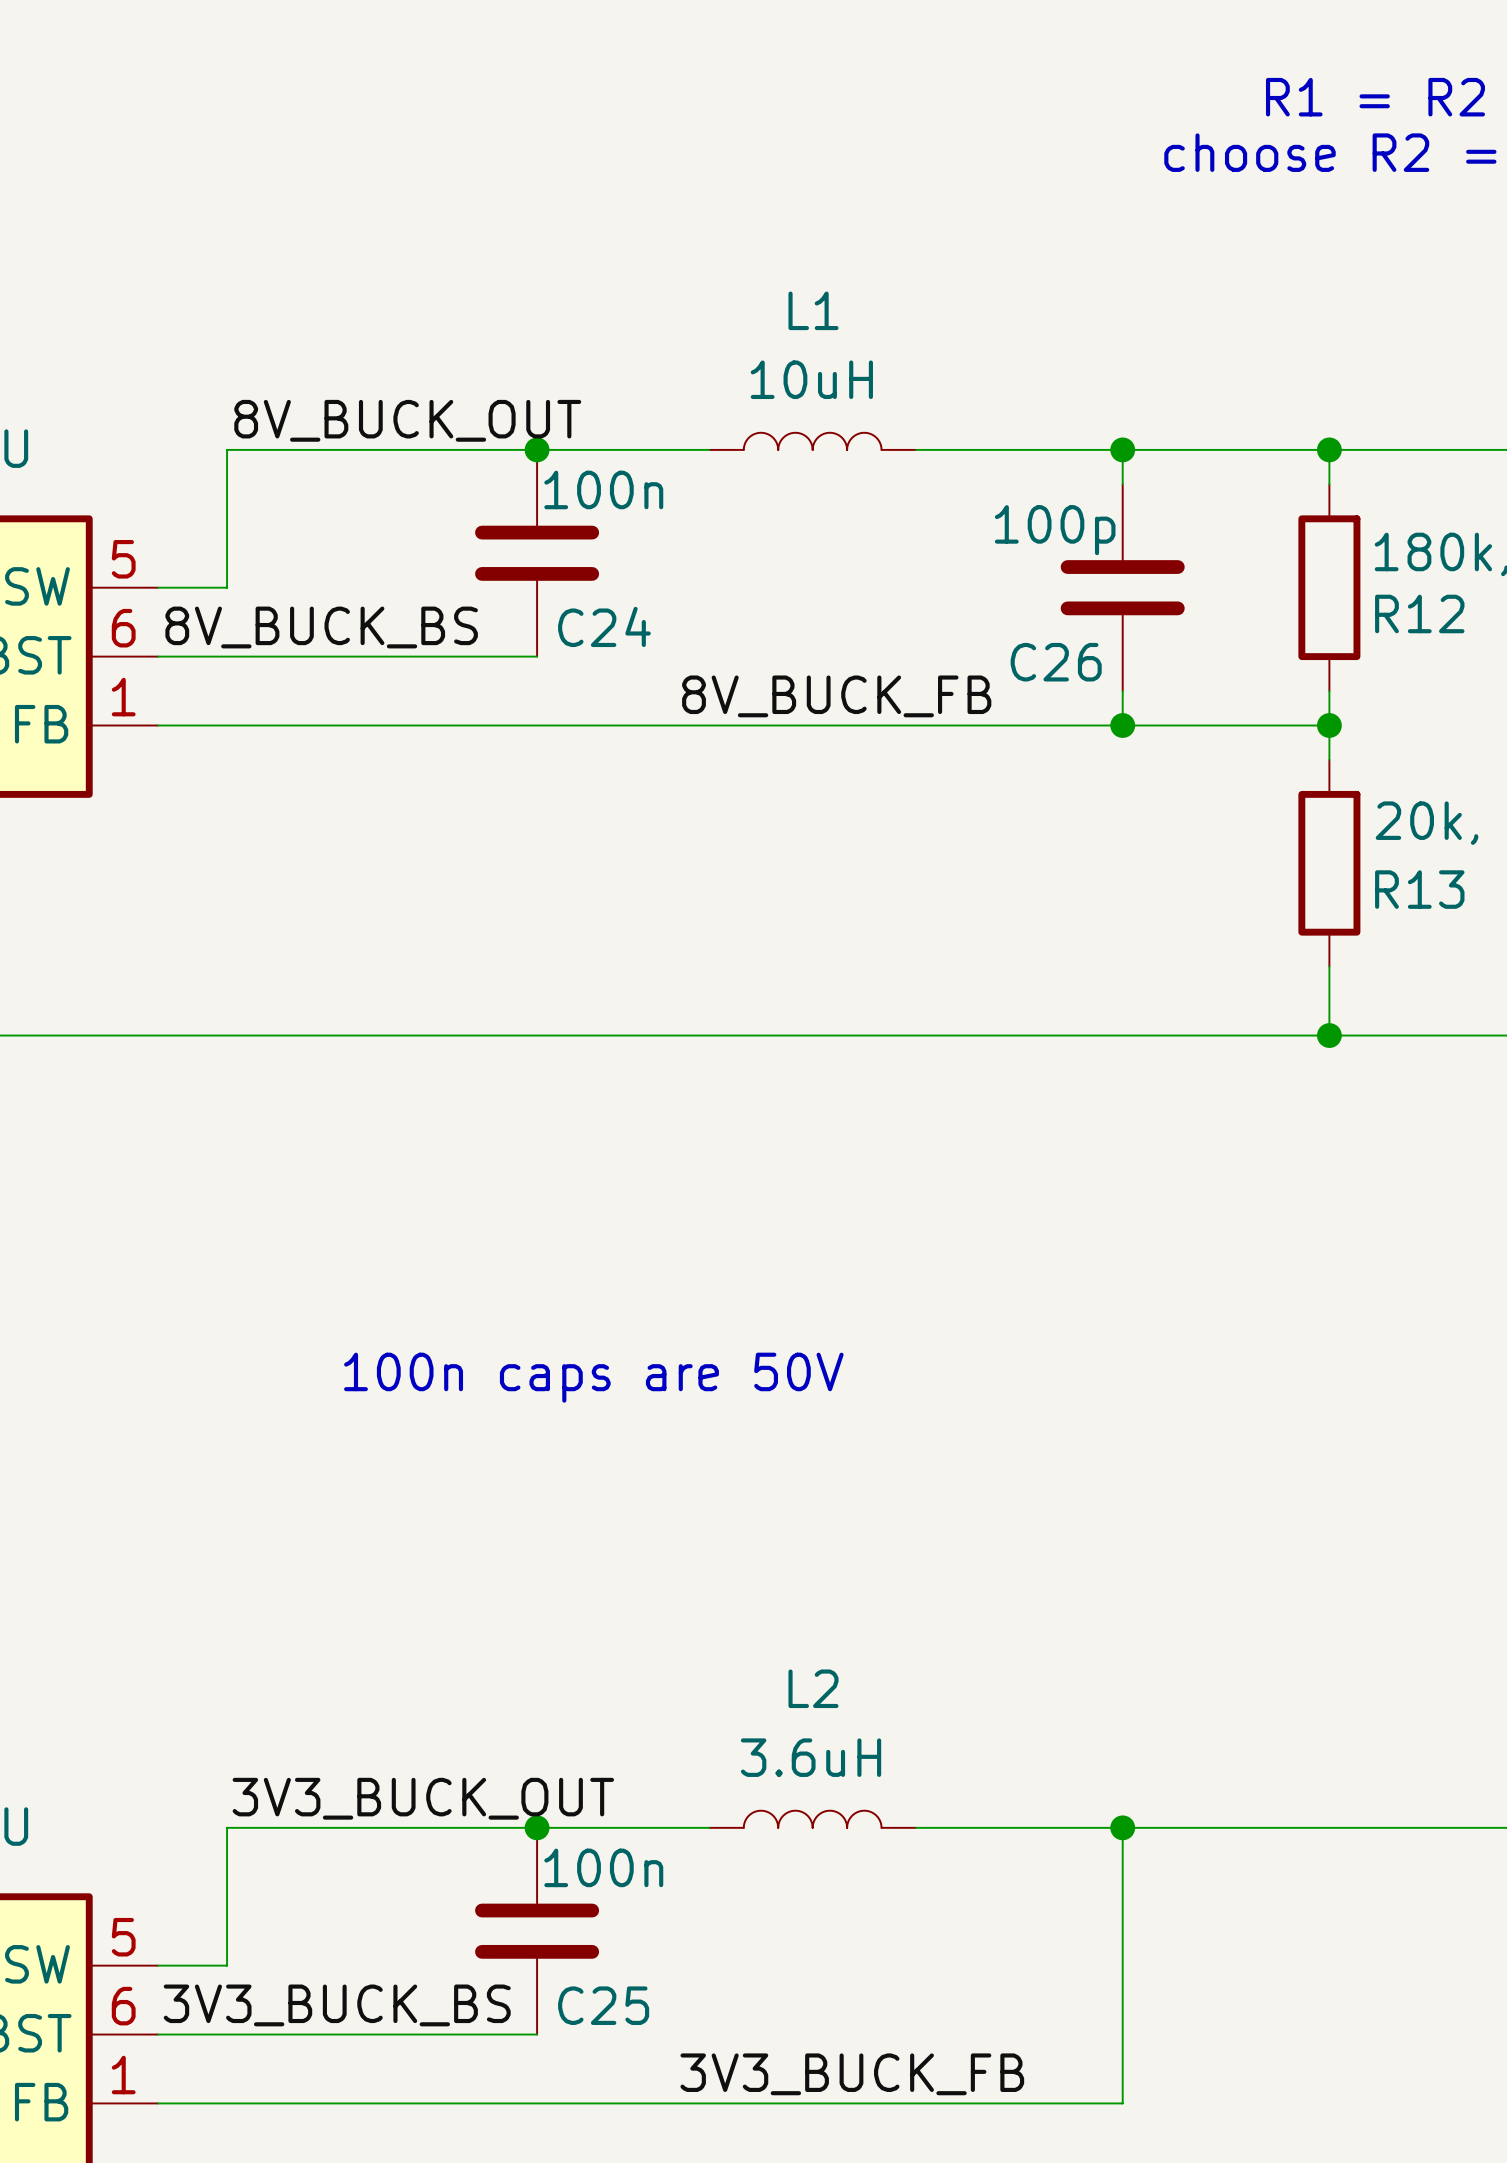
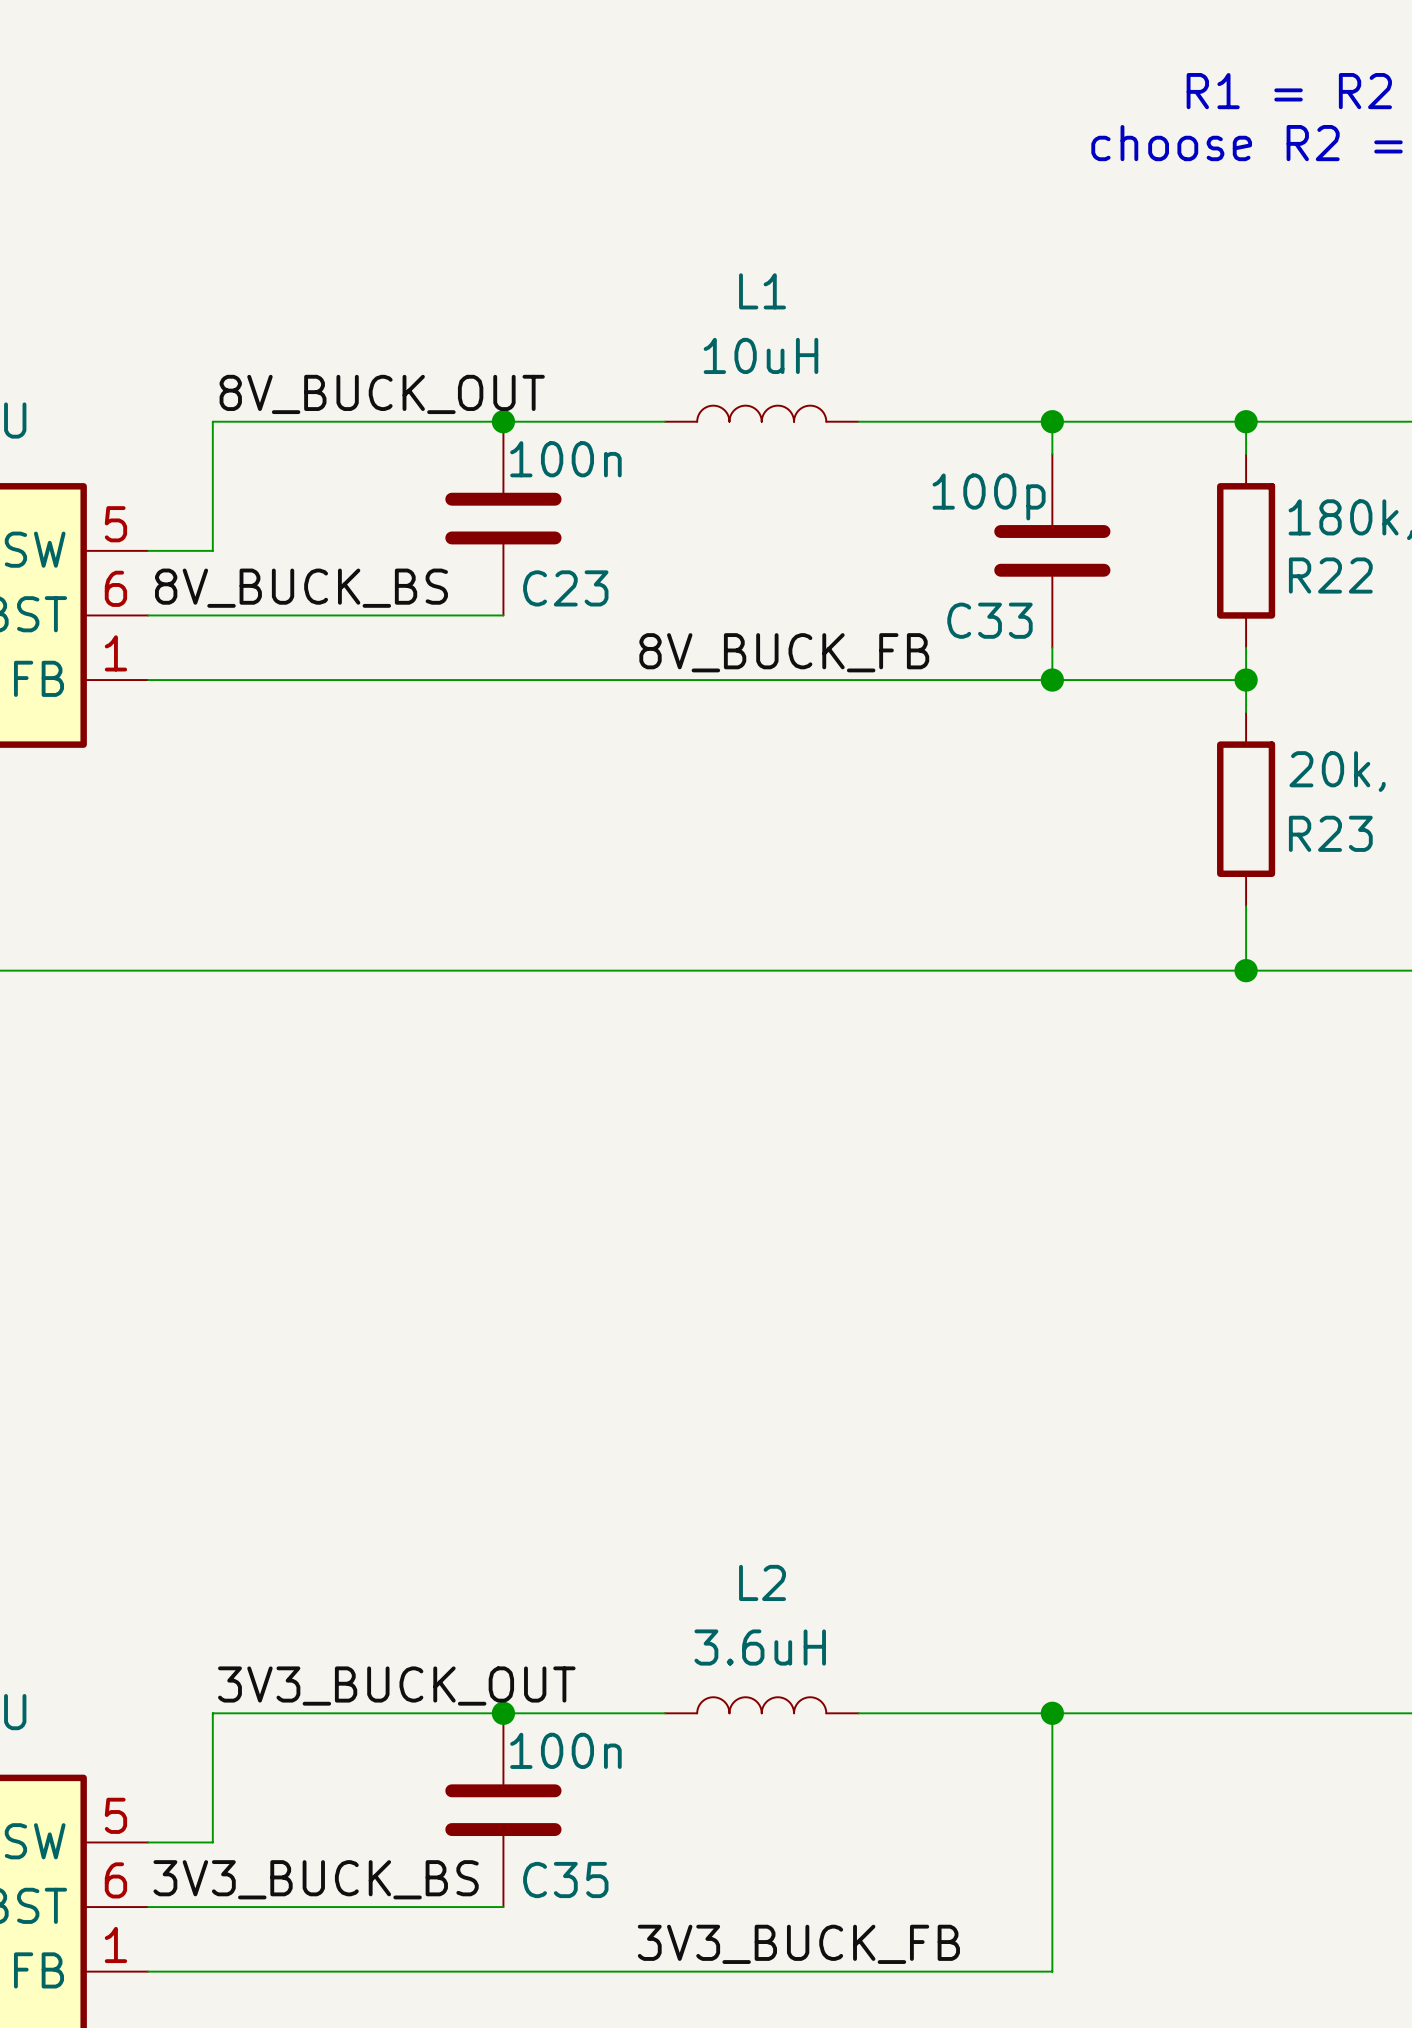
R12 name: R12 (1419, 613) -> R22 (1330, 575)
C24 name: C24 (604, 626) -> C23 (565, 588)
C26 name: C26 (1056, 662) -> C33 (989, 620)
R13 name: R13 (1419, 889) -> R23 (1330, 833)
text: 100n caps are 50V (593, 1377) -> none
C25 name: C25 (603, 2005) -> C35 (565, 1880)

